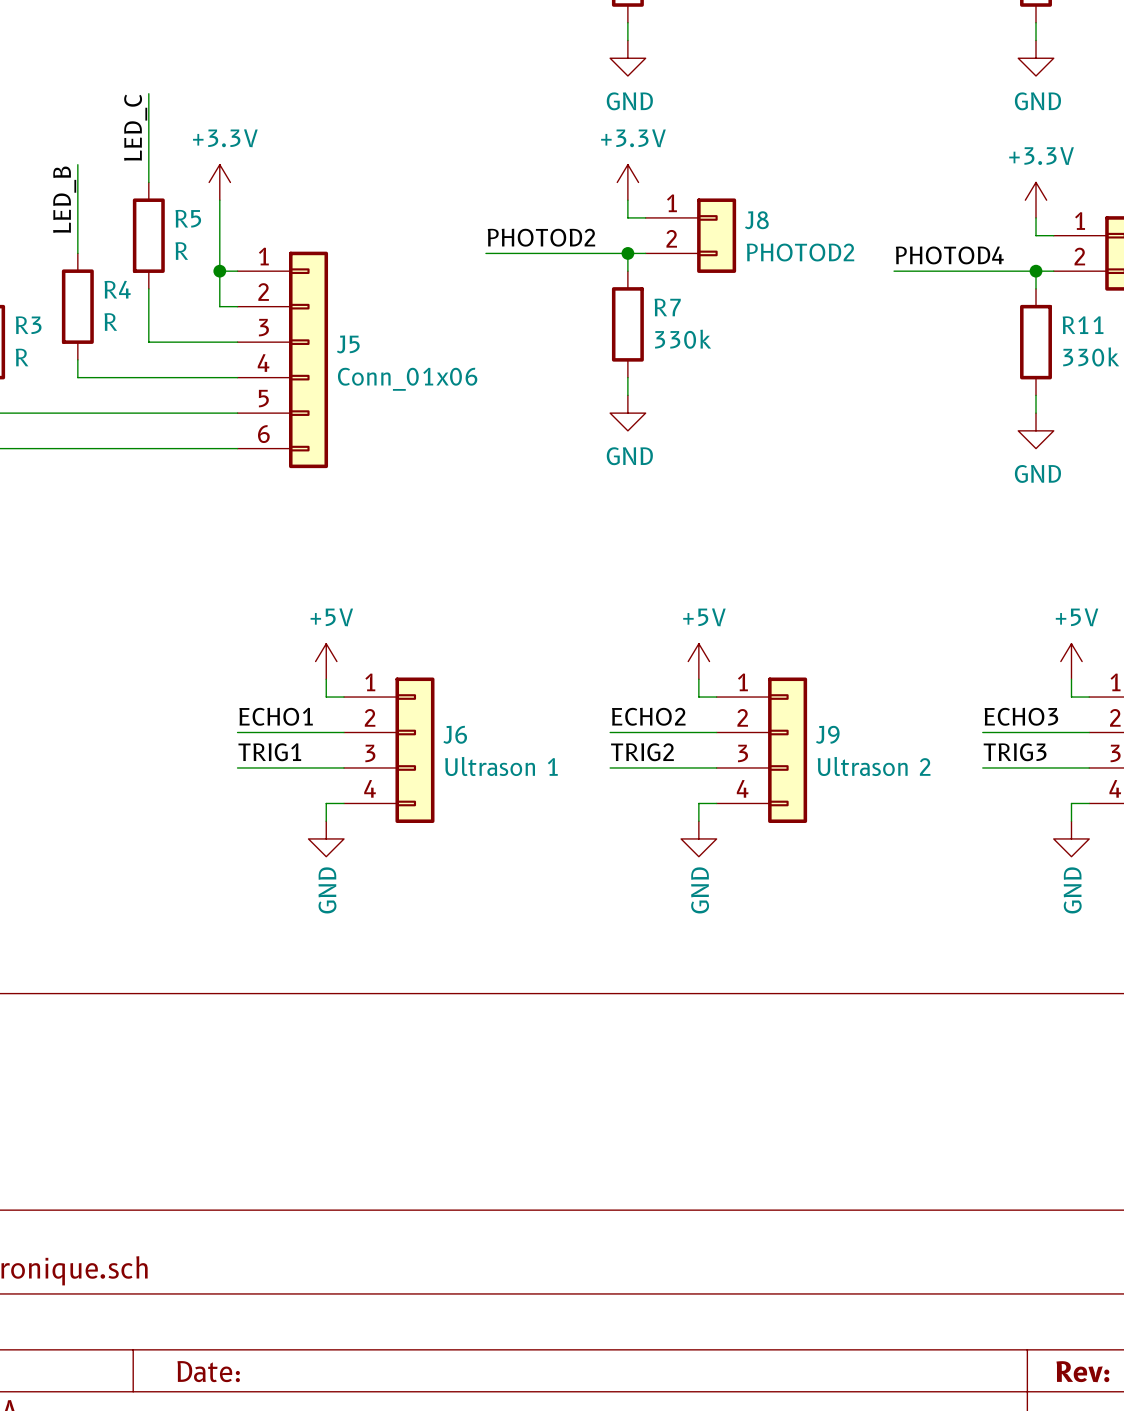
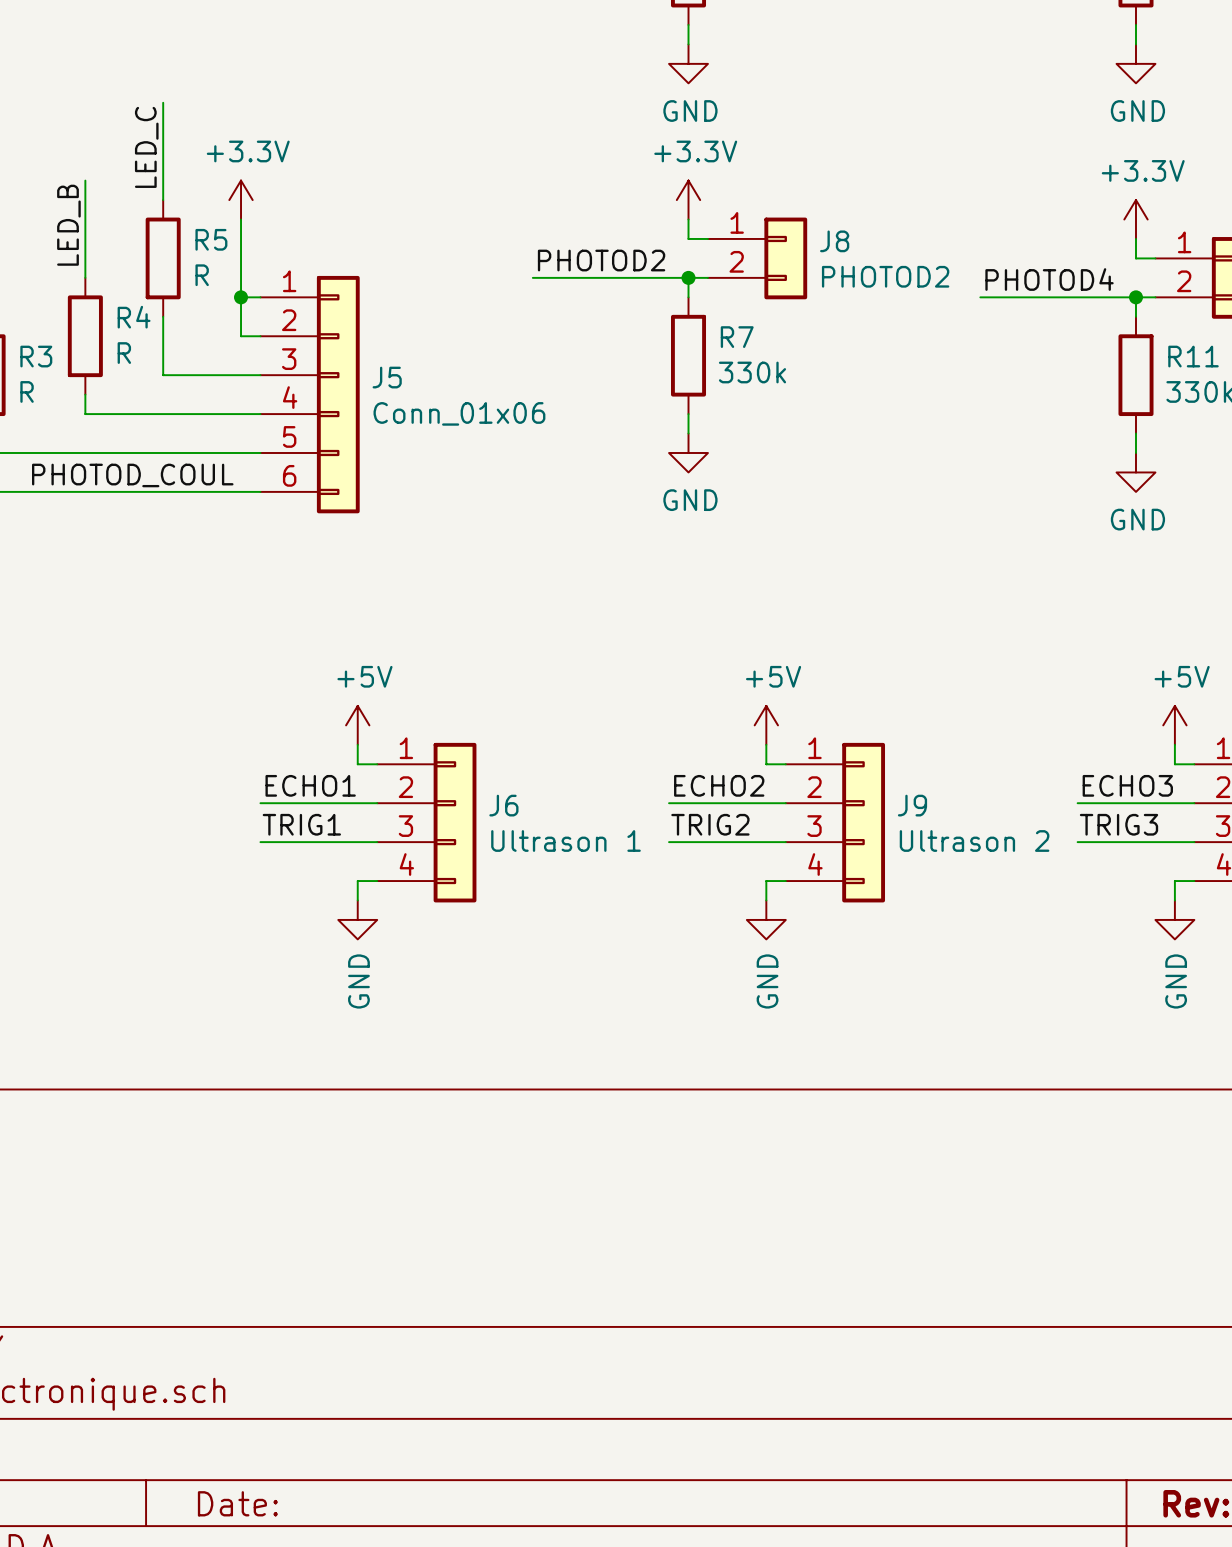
label: none -> PHOTOD_COUL (132, 475)

